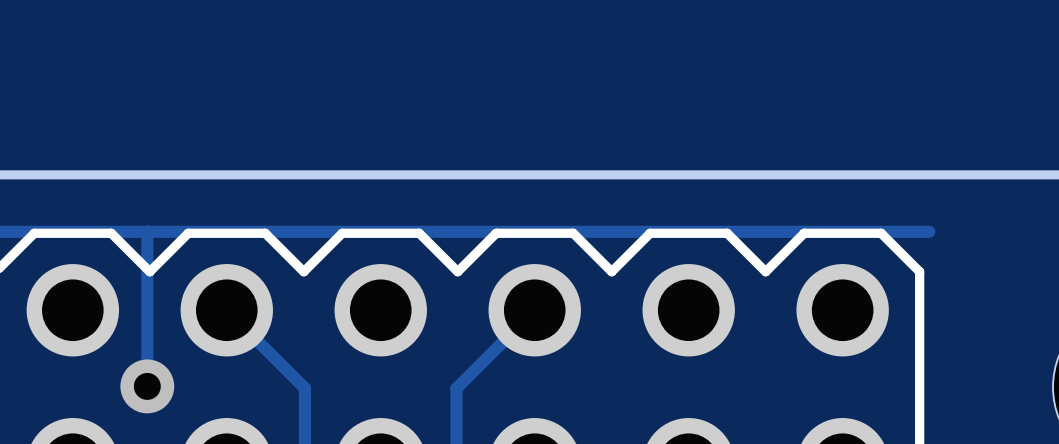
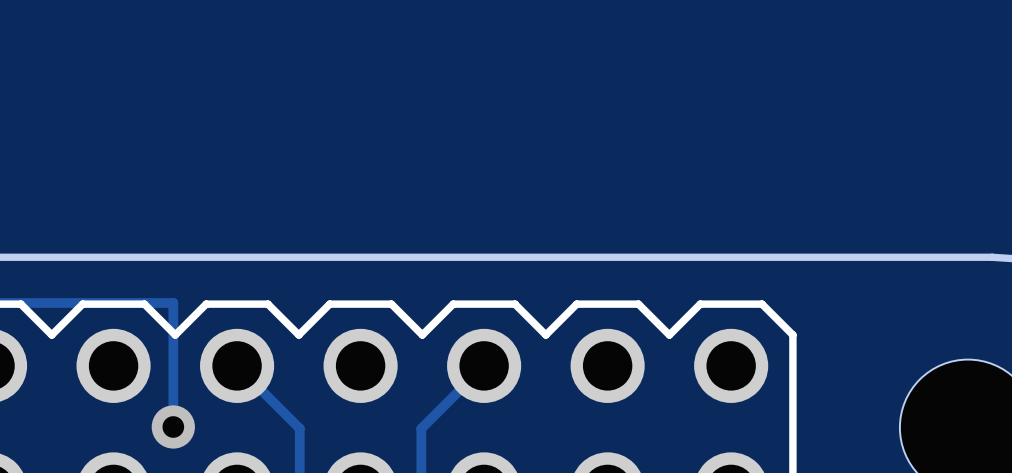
track: (147, 231) (929, 231) -> none

